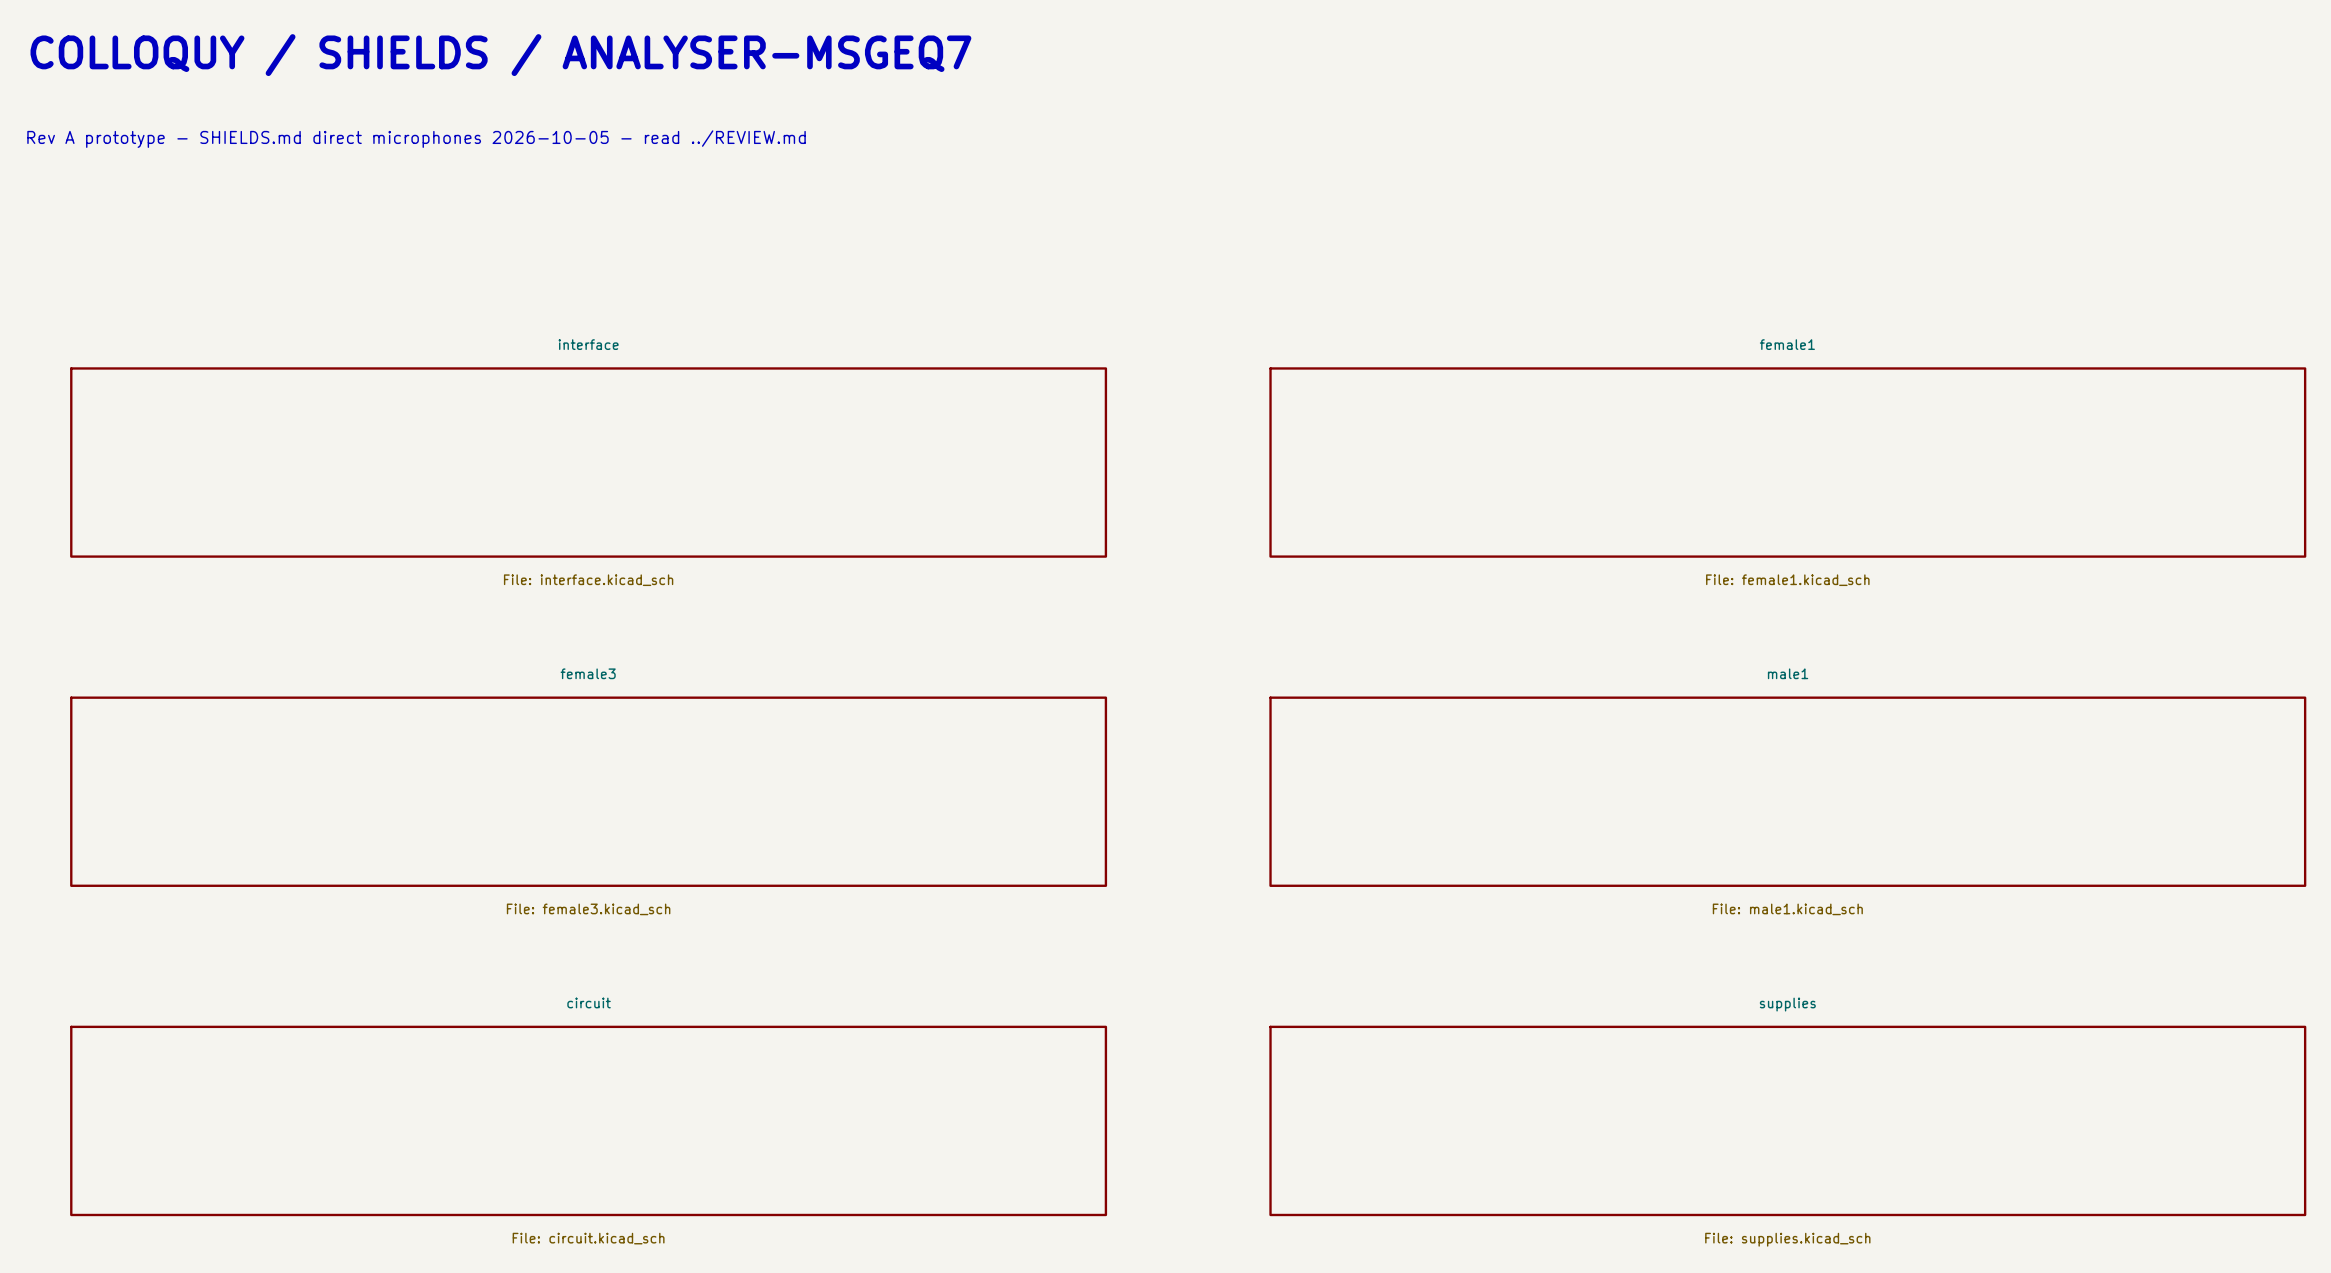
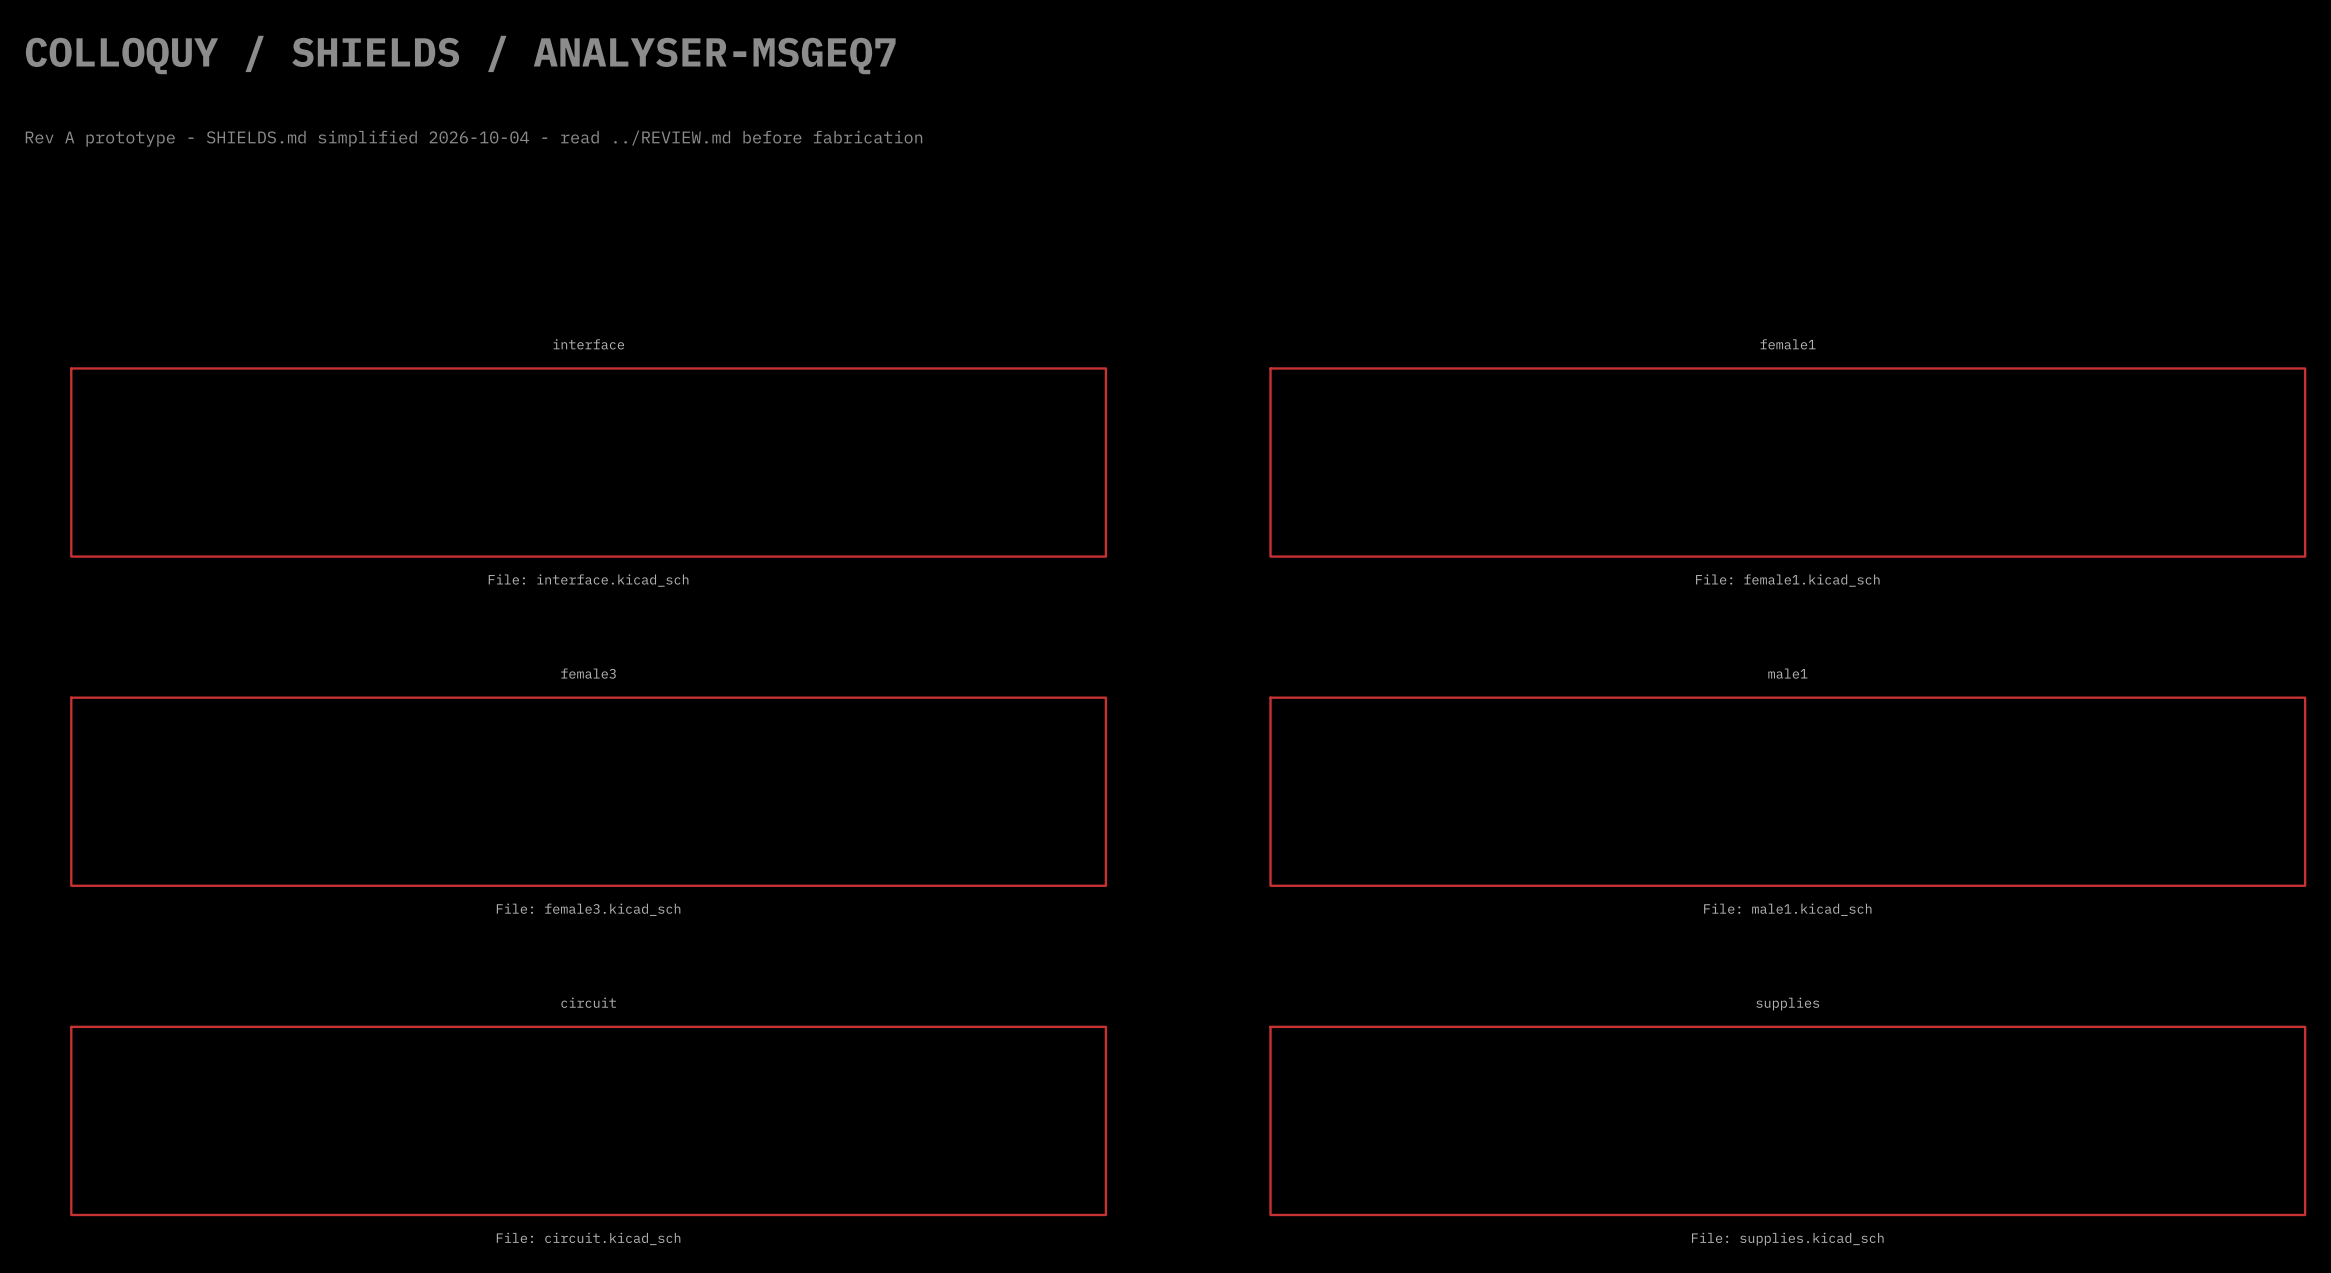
text: Rev A prototype - SHIELDS.md direct microphones 2026-10-05 - read ../REVIEW.md (416, 139) -> Rev A prototype - SHIELDS.md simplified 2026-10-04 - read ../REVIEW.md before fabrication (473, 138)

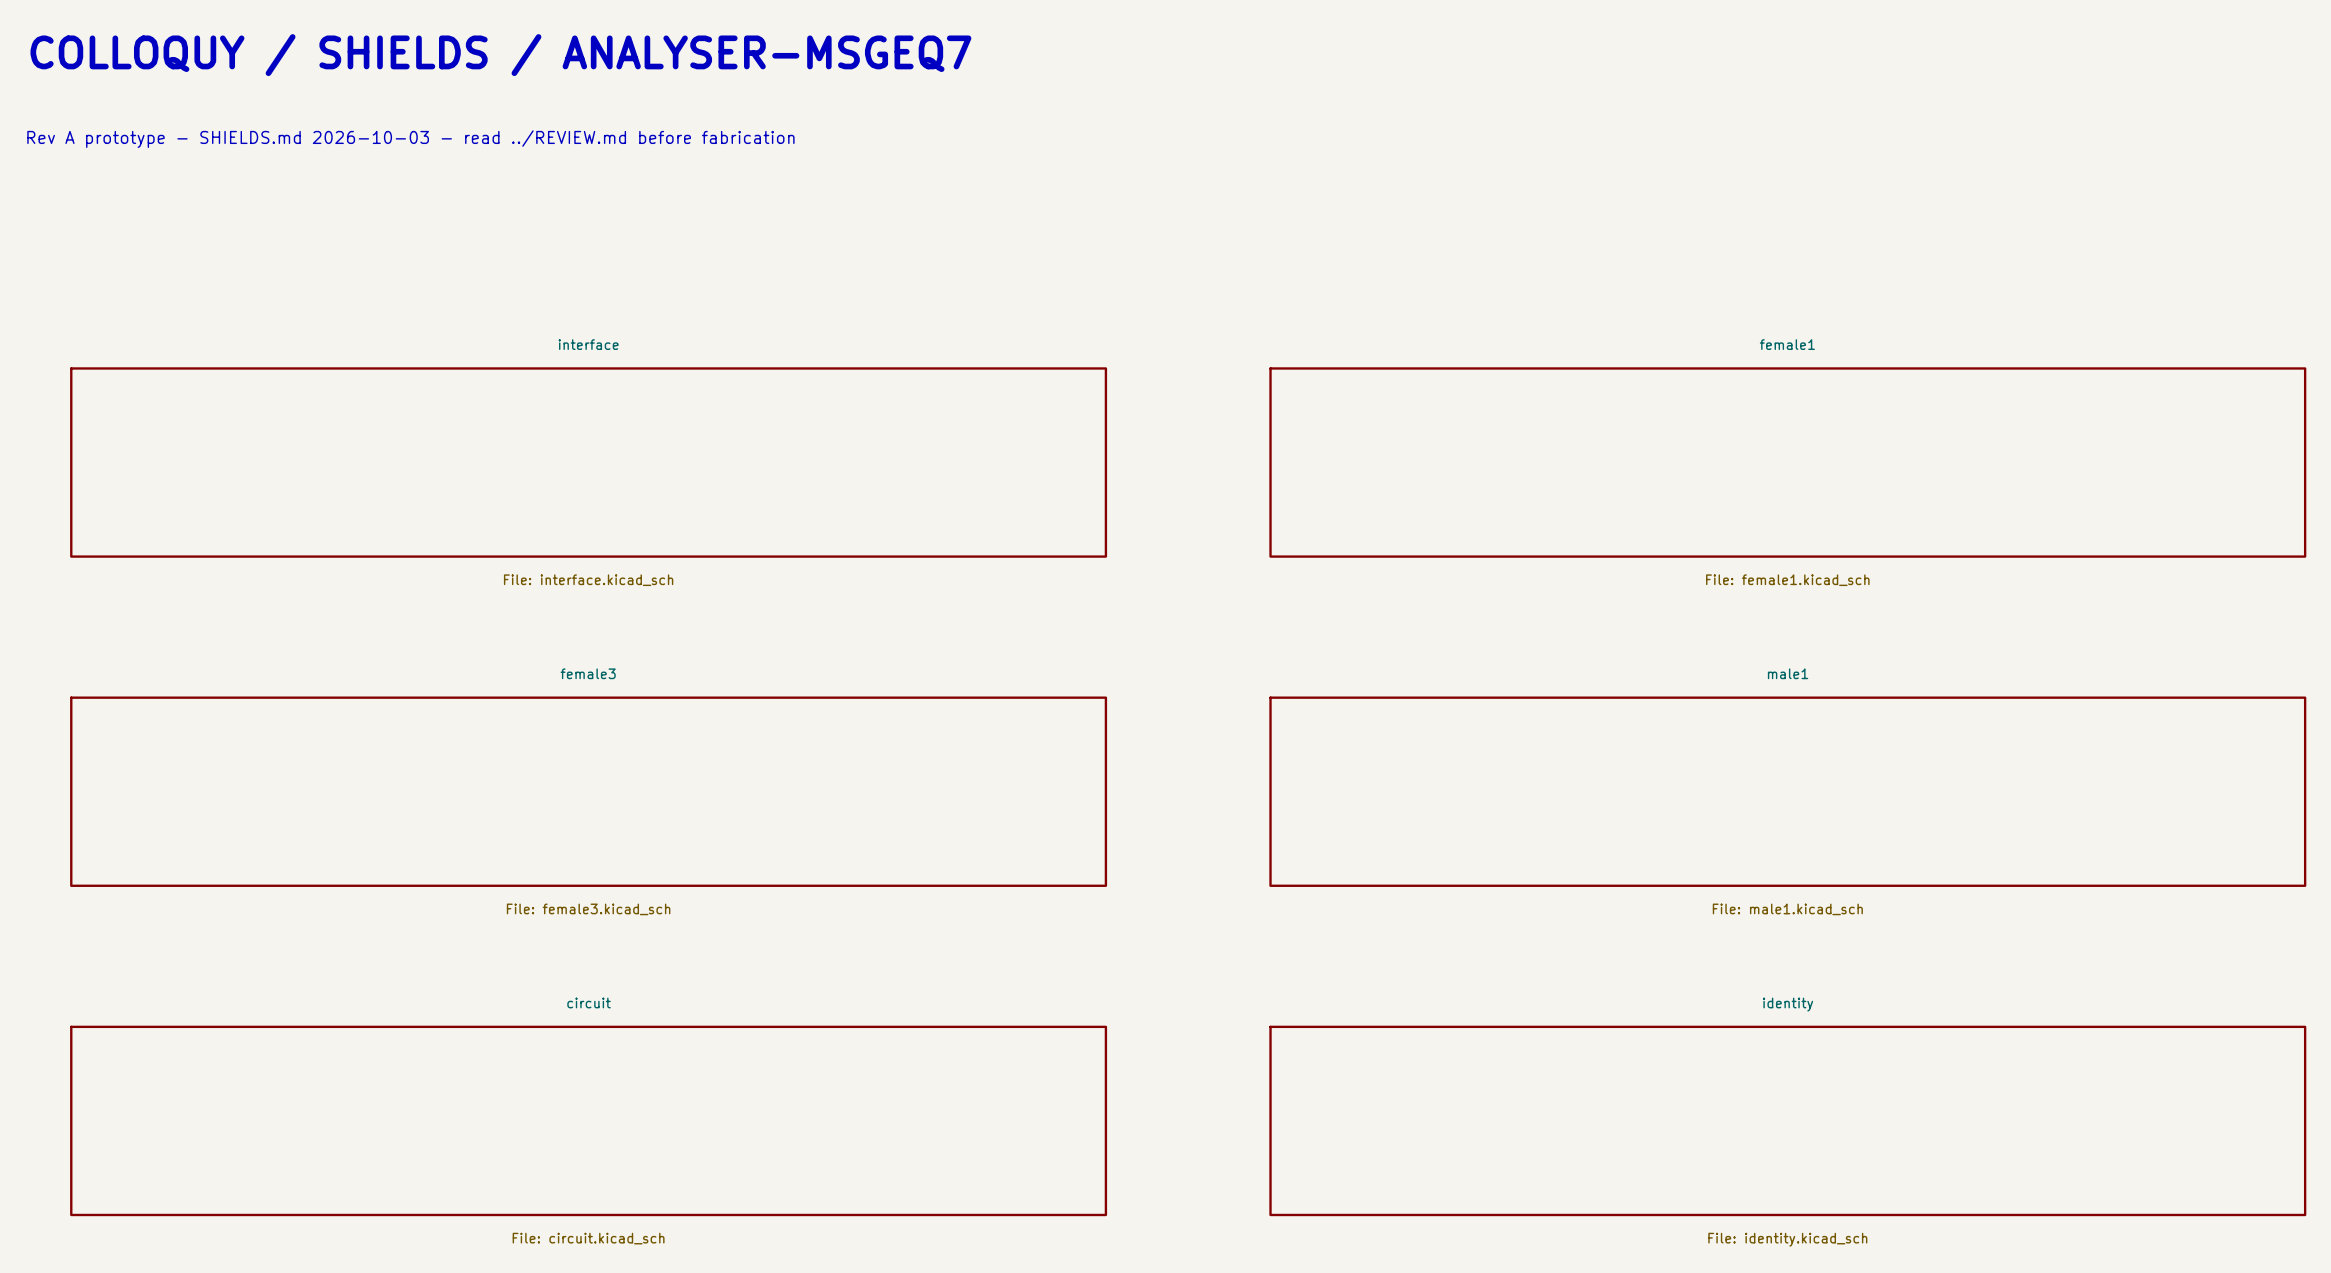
text: Rev A prototype - SHIELDS.md simplified 2026-10-04 - read ../REVIEW.md before fabrication (473, 138) -> Rev A prototype - SHIELDS.md 2026-10-03 - read ../REVIEW.md before fabrication (410, 139)
sheet supplies name: supplies (1787, 1004) -> identity (1788, 1004)
sheet supplies value: File: supplies.kicad_sch (1787, 1239) -> File: identity.kicad_sch (1787, 1239)

